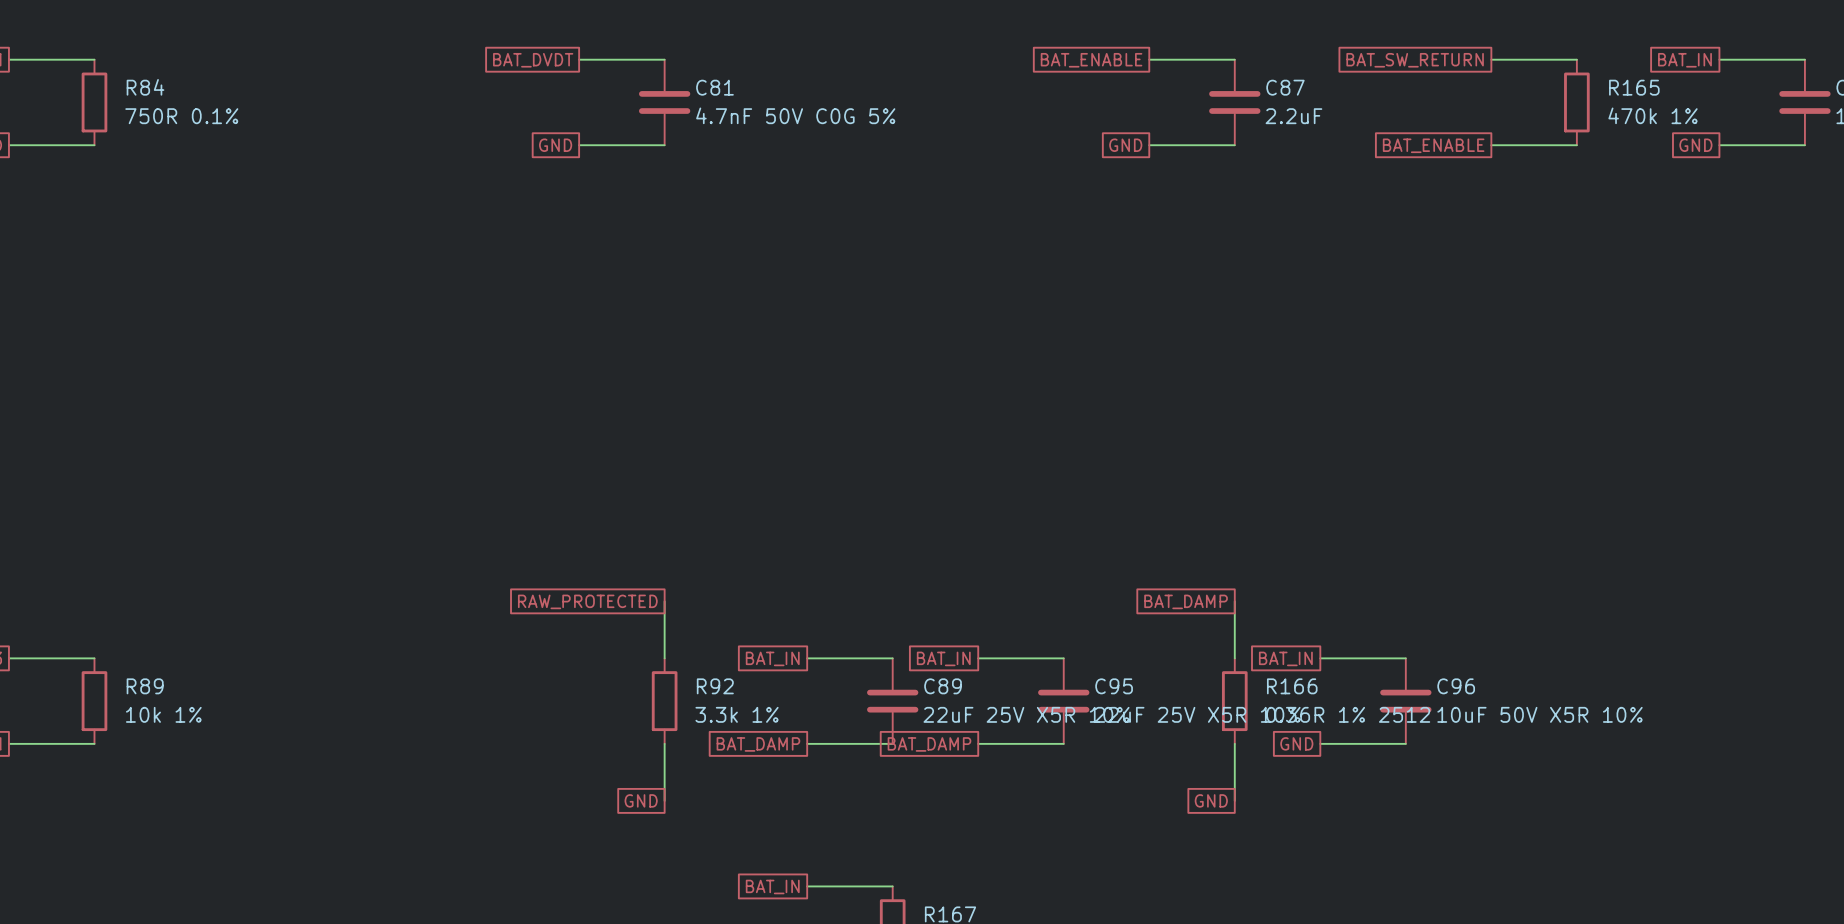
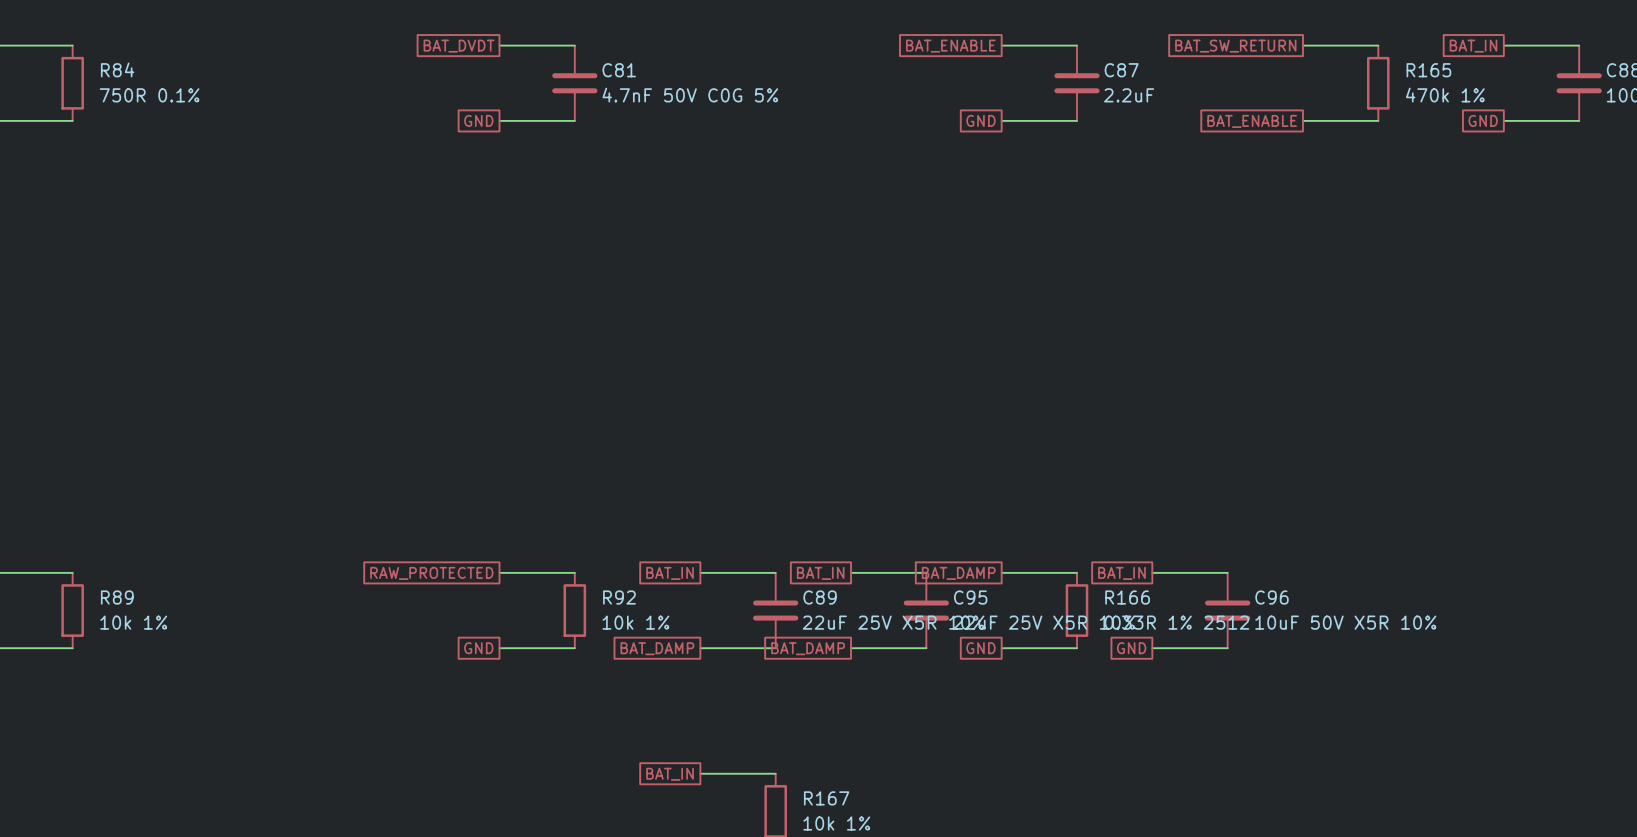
global label position: RAW_PROTECTED (587, 601) -> RAW_PROTECTED (431, 573)
wire: (664, 601) (664, 658) -> (499, 572) (574, 572)
global label position: BAT_DAMP (1186, 601) -> BAT_DAMP (958, 573)
wire: (1234, 601) (1234, 658) -> (1001, 572) (1077, 572)
R92 value: 3.3k 1% (737, 714) -> 10k 1% (635, 622)
R166 value: 0.36R 1% 2512 (1348, 714) -> 0.33R 1% 2512 (1176, 622)
wire: (664, 743) (664, 800) -> (574, 648) (499, 648)
wire: (1234, 743) (1234, 800) -> (1077, 648) (1001, 648)
global label position: GND (641, 800) -> GND (478, 648)
global label position: GND (1211, 800) -> GND (980, 648)

